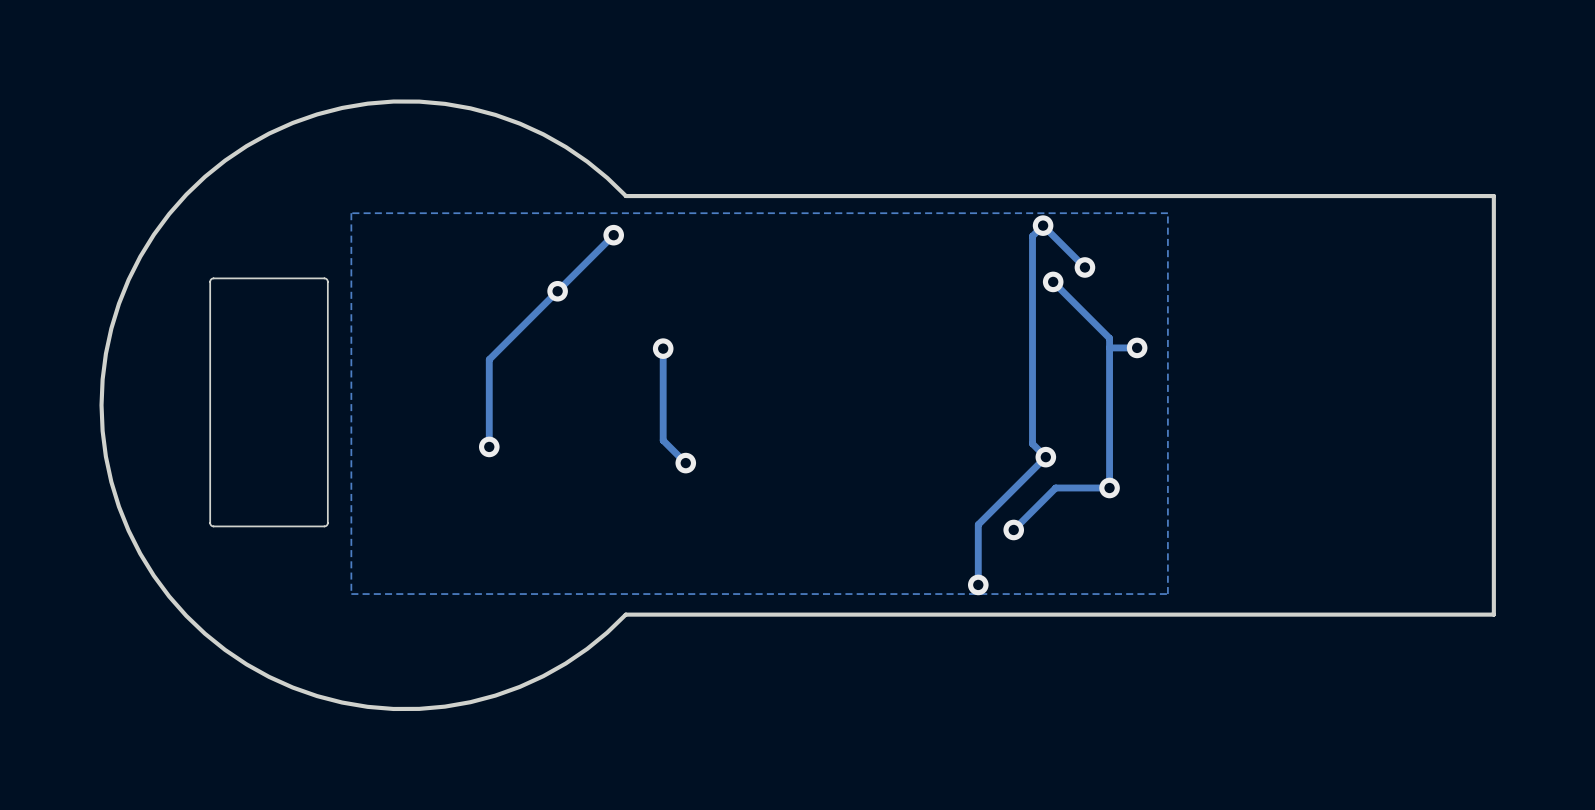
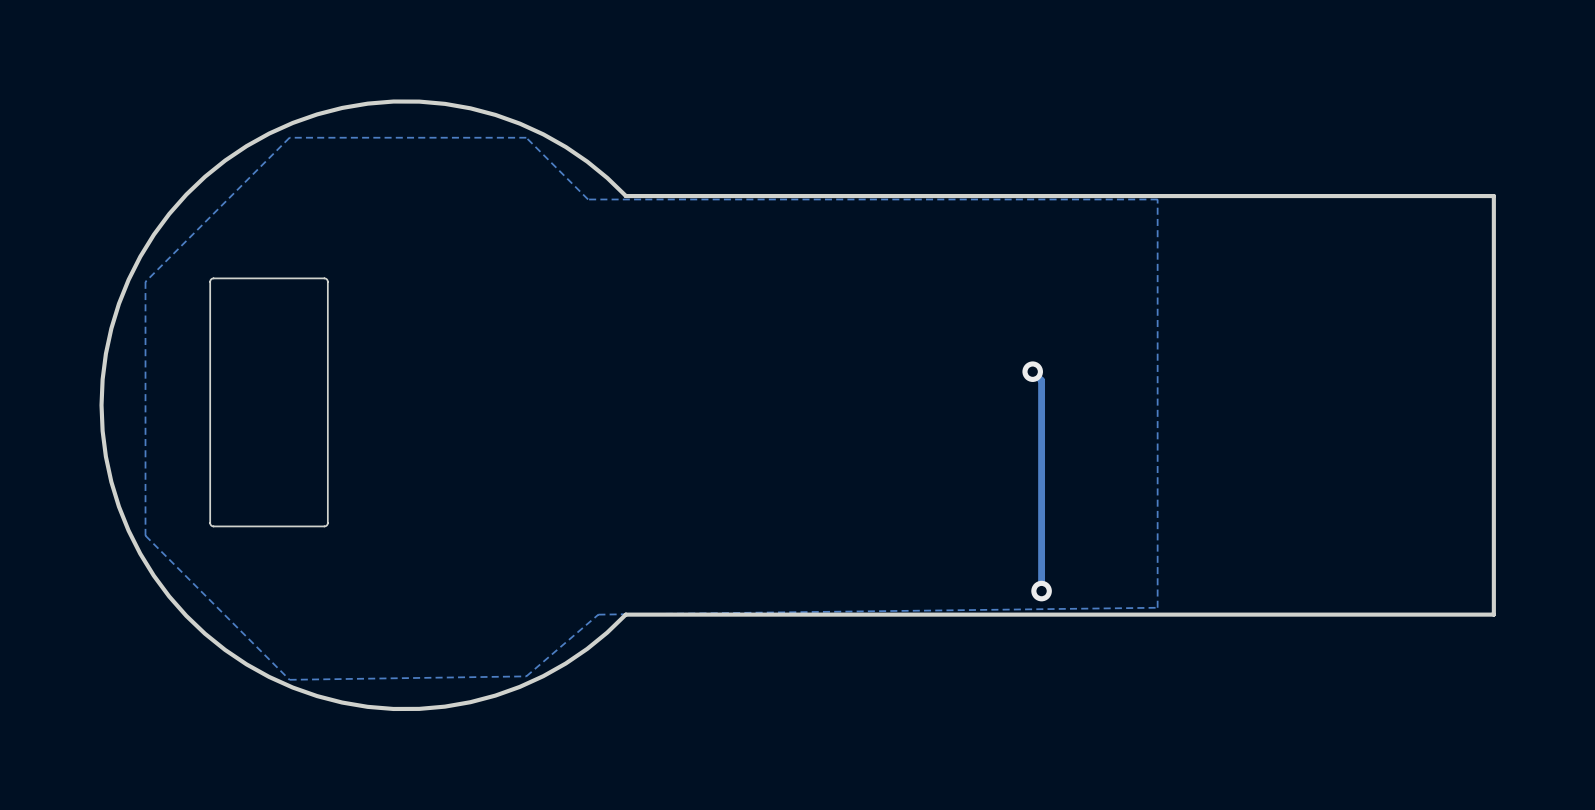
zone outline: (1167, 213) (1167, 594) (351, 594) (351, 213) (1167, 213) -> (526, 137) (588, 199) (1157, 199) (1157, 607) (598, 614) (526, 676) (289, 679) (145, 535) (145, 281) (289, 137) (526, 137)
via: (1043, 225) -> none
track: (613, 235) (489, 359) (489, 446) -> none
via: (613, 235) -> none
track: (1084, 267) (1043, 225) (1032, 236) (1032, 443) (1045, 457) (978, 524) (978, 584) -> none
via: (1084, 267) -> none
track: (1053, 281) (1109, 338) (1109, 487) (1055, 487) (1013, 529) -> none
via: (1053, 281) -> none
via: (557, 291) -> none
track: (1137, 347) (1109, 347) -> none
via: (1137, 347) -> none
track: (663, 348) (663, 440) (685, 463) -> none
via: (663, 348) -> none
track: none -> (1032, 371) (1041, 380) (1041, 591)
via: none -> (1032, 371)
via: (489, 446) -> none
via: (1045, 457) -> none
via: (685, 463) -> none
via: (1109, 487) -> none
via: (1013, 529) -> none
via: (978, 584) -> none
via: none -> (1041, 591)

